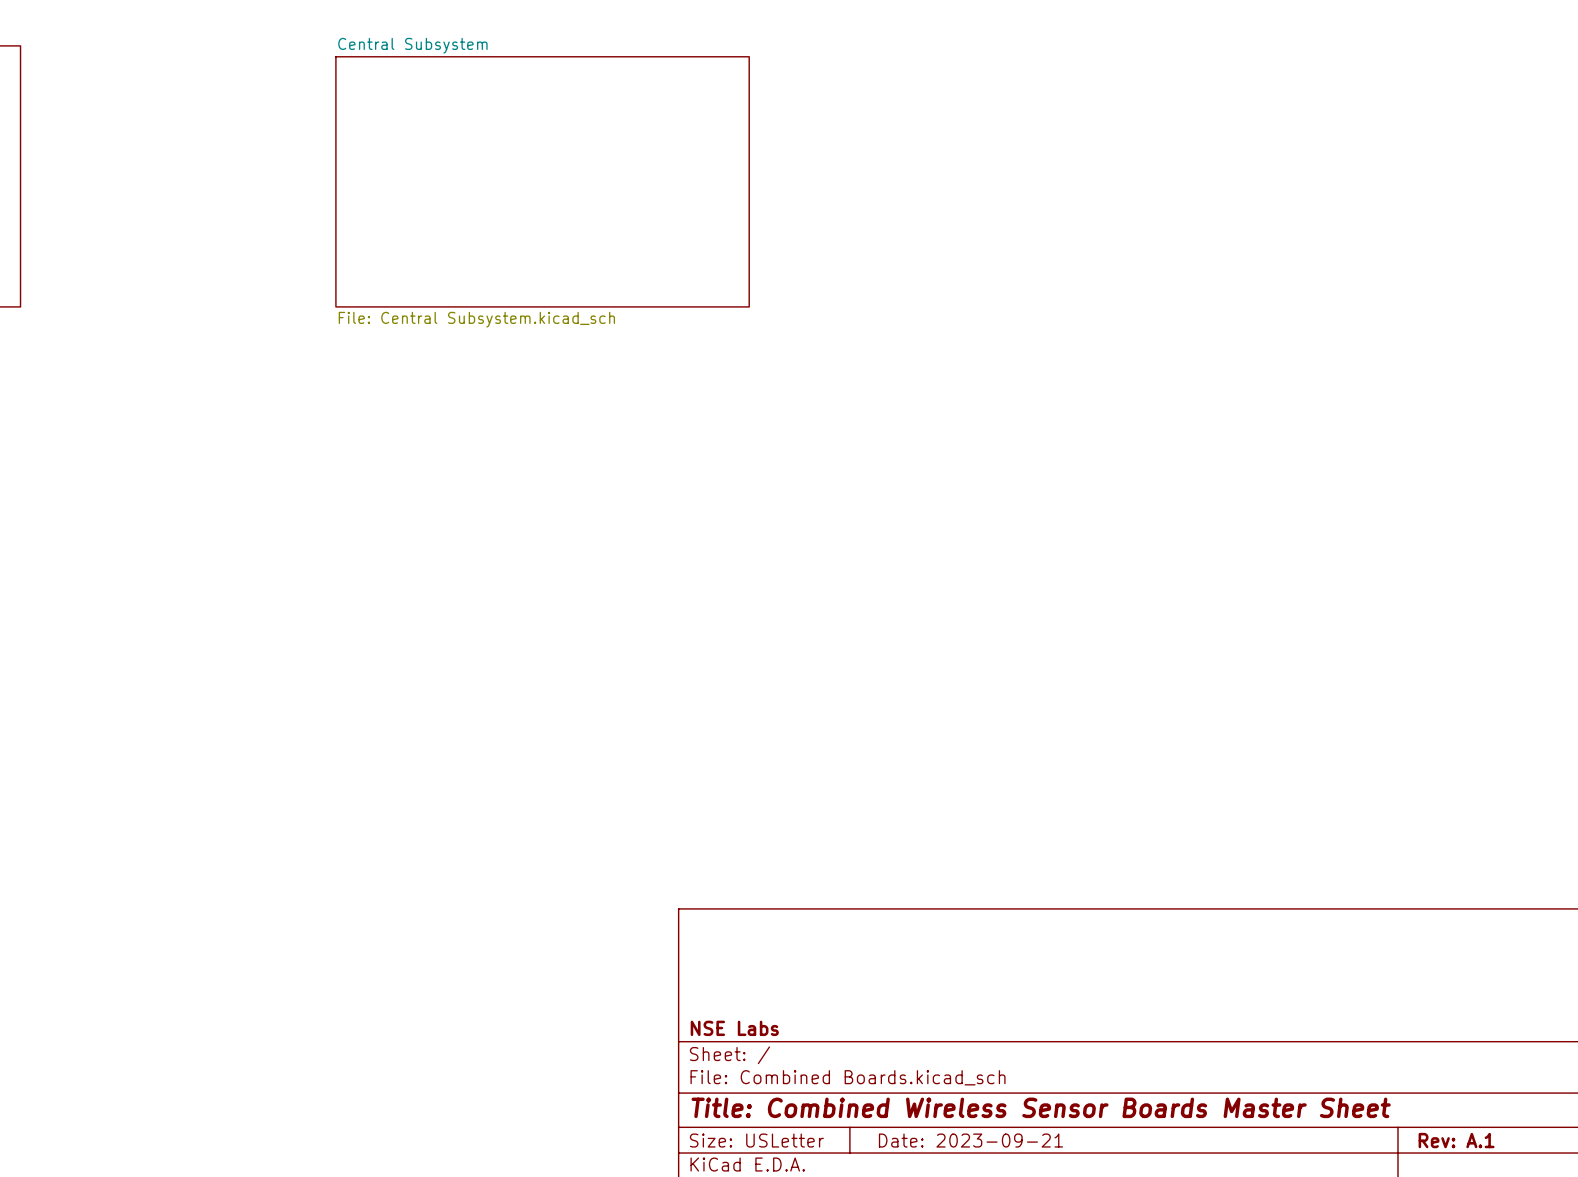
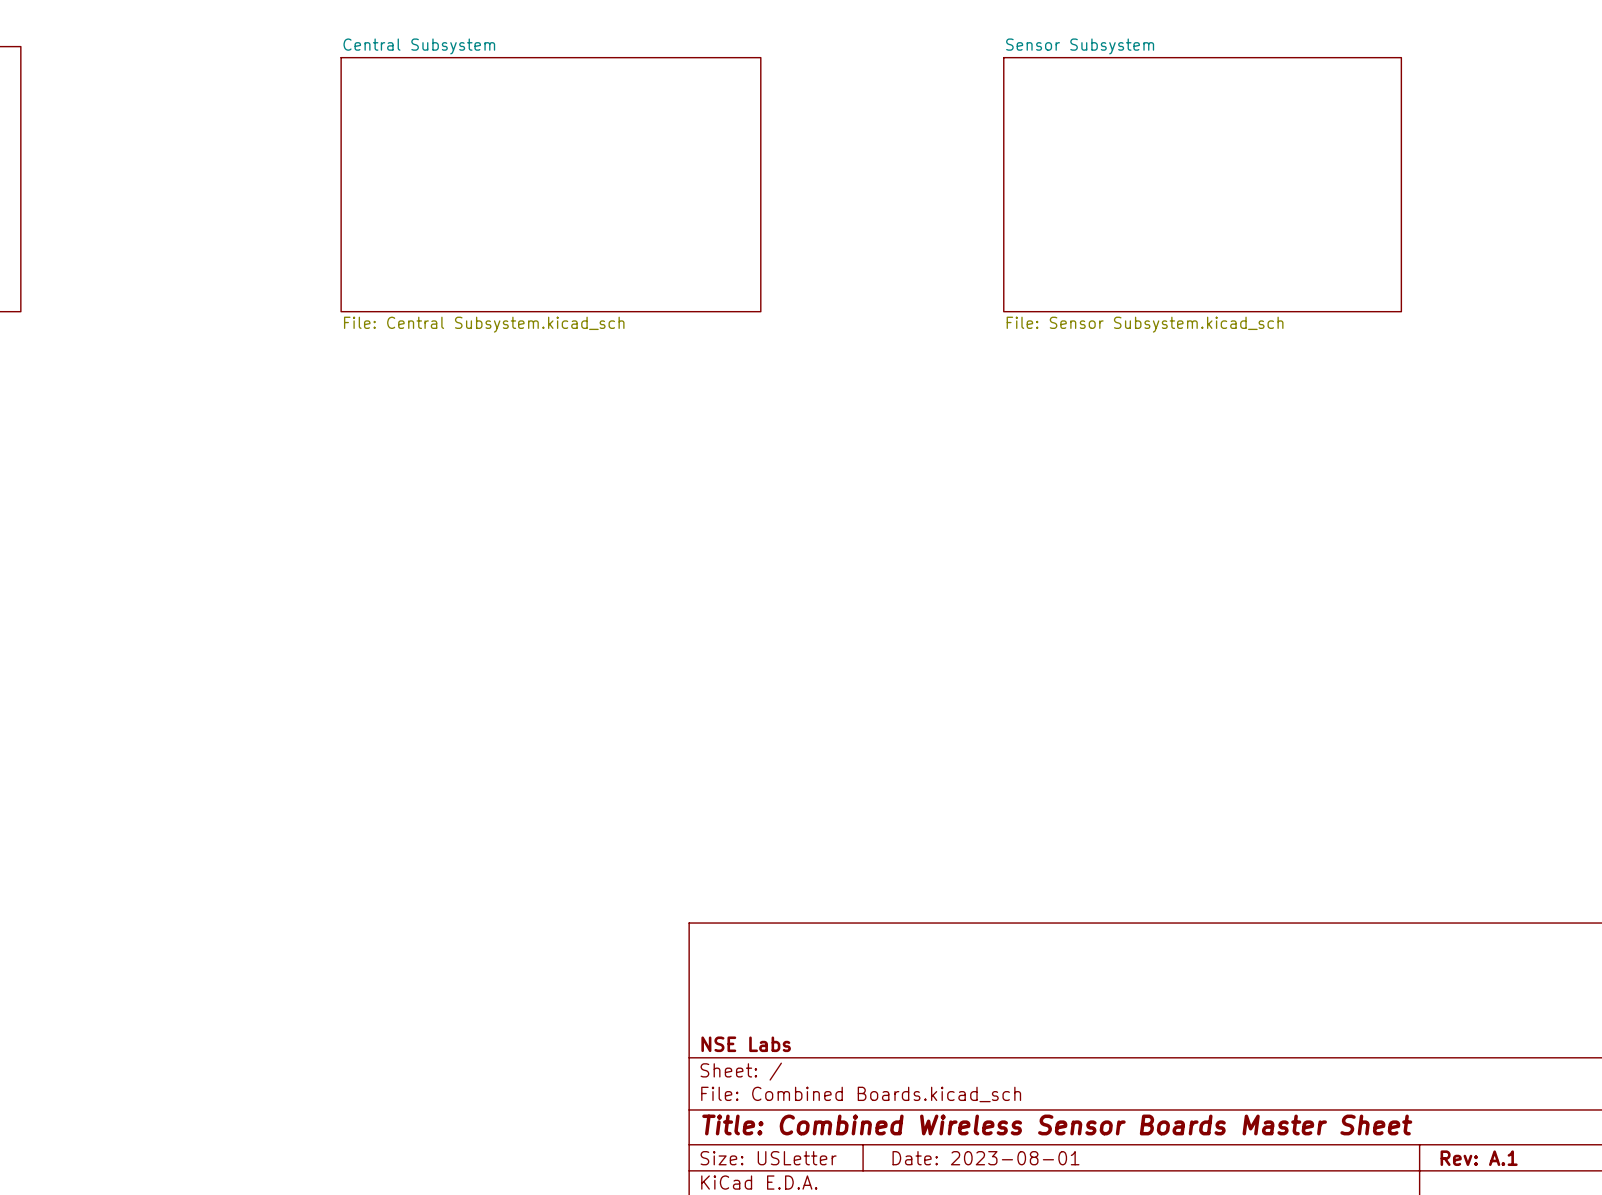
sheet Sensor Subsystem: none -> File: Sensor Subsystem.kicad_sch (1202, 184)
title block: Date: 2023-09-21 (970, 1140) -> Date: 2023-08-01 (986, 1158)

